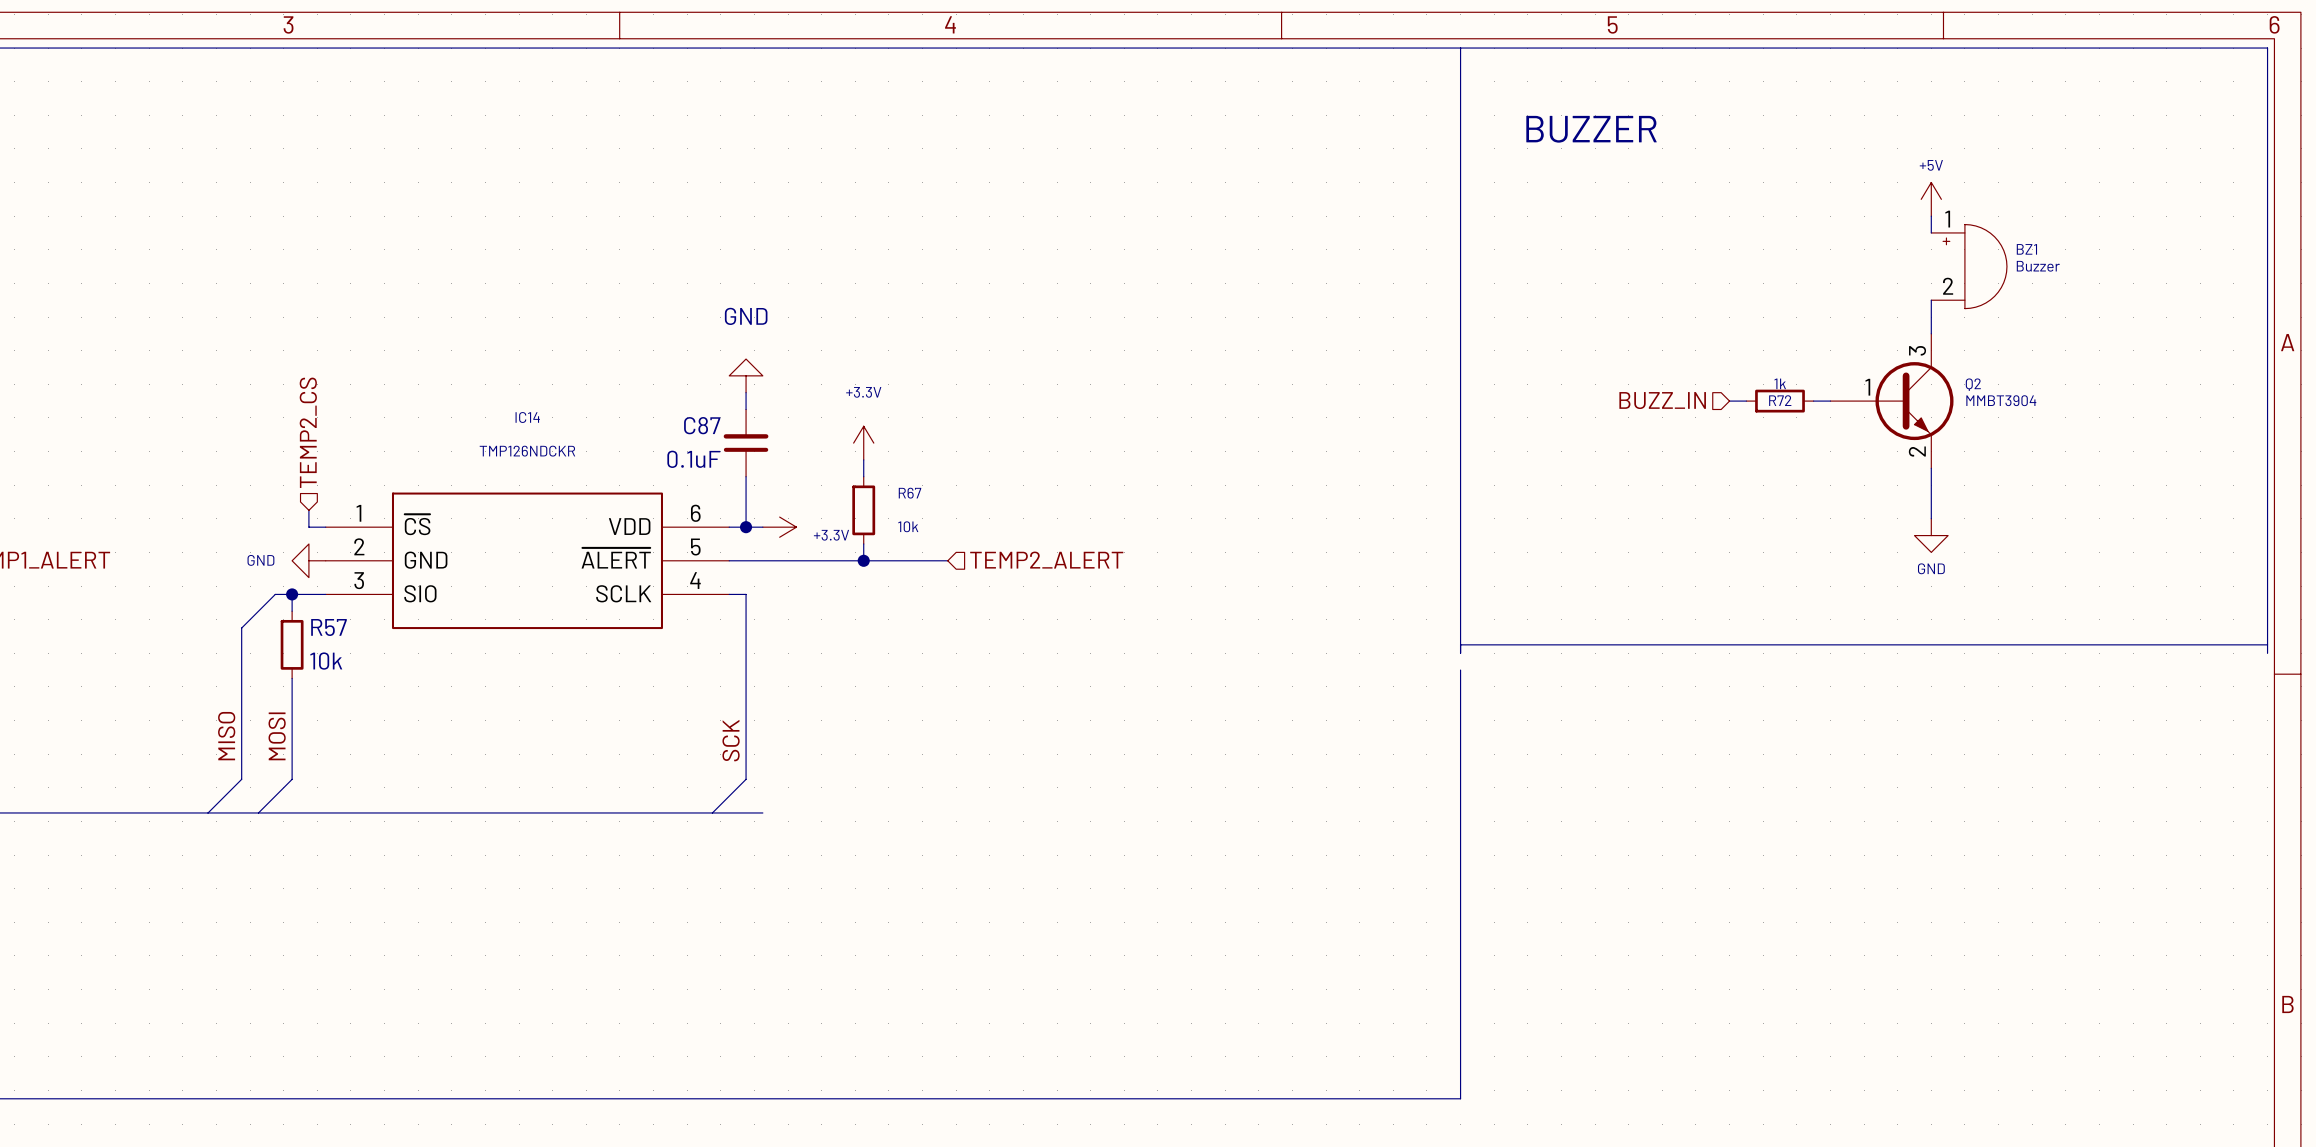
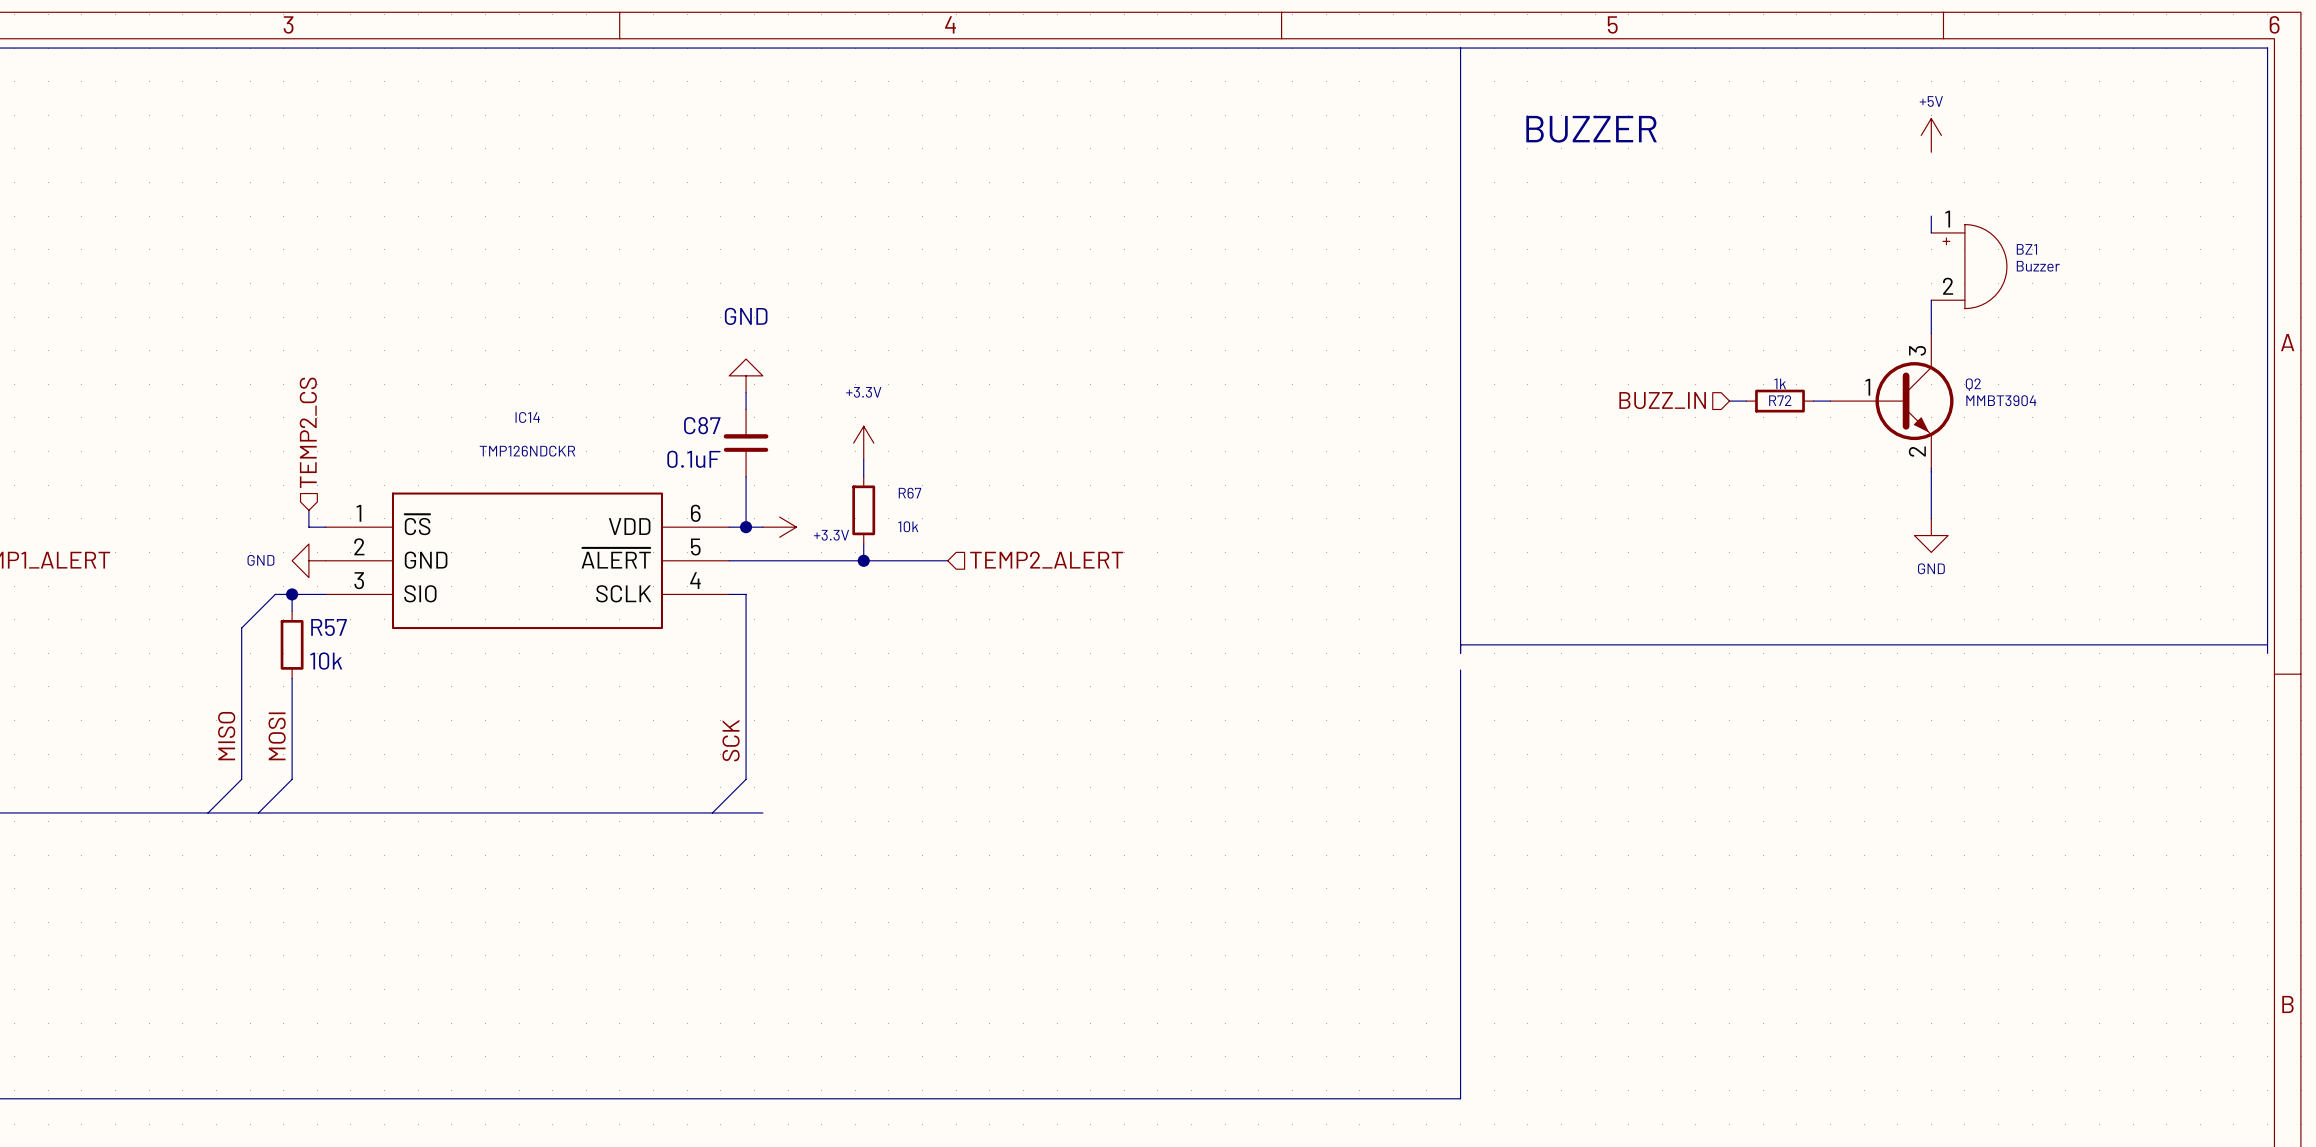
power symbol position: +5V (1931, 199) -> +5V (1931, 135)

